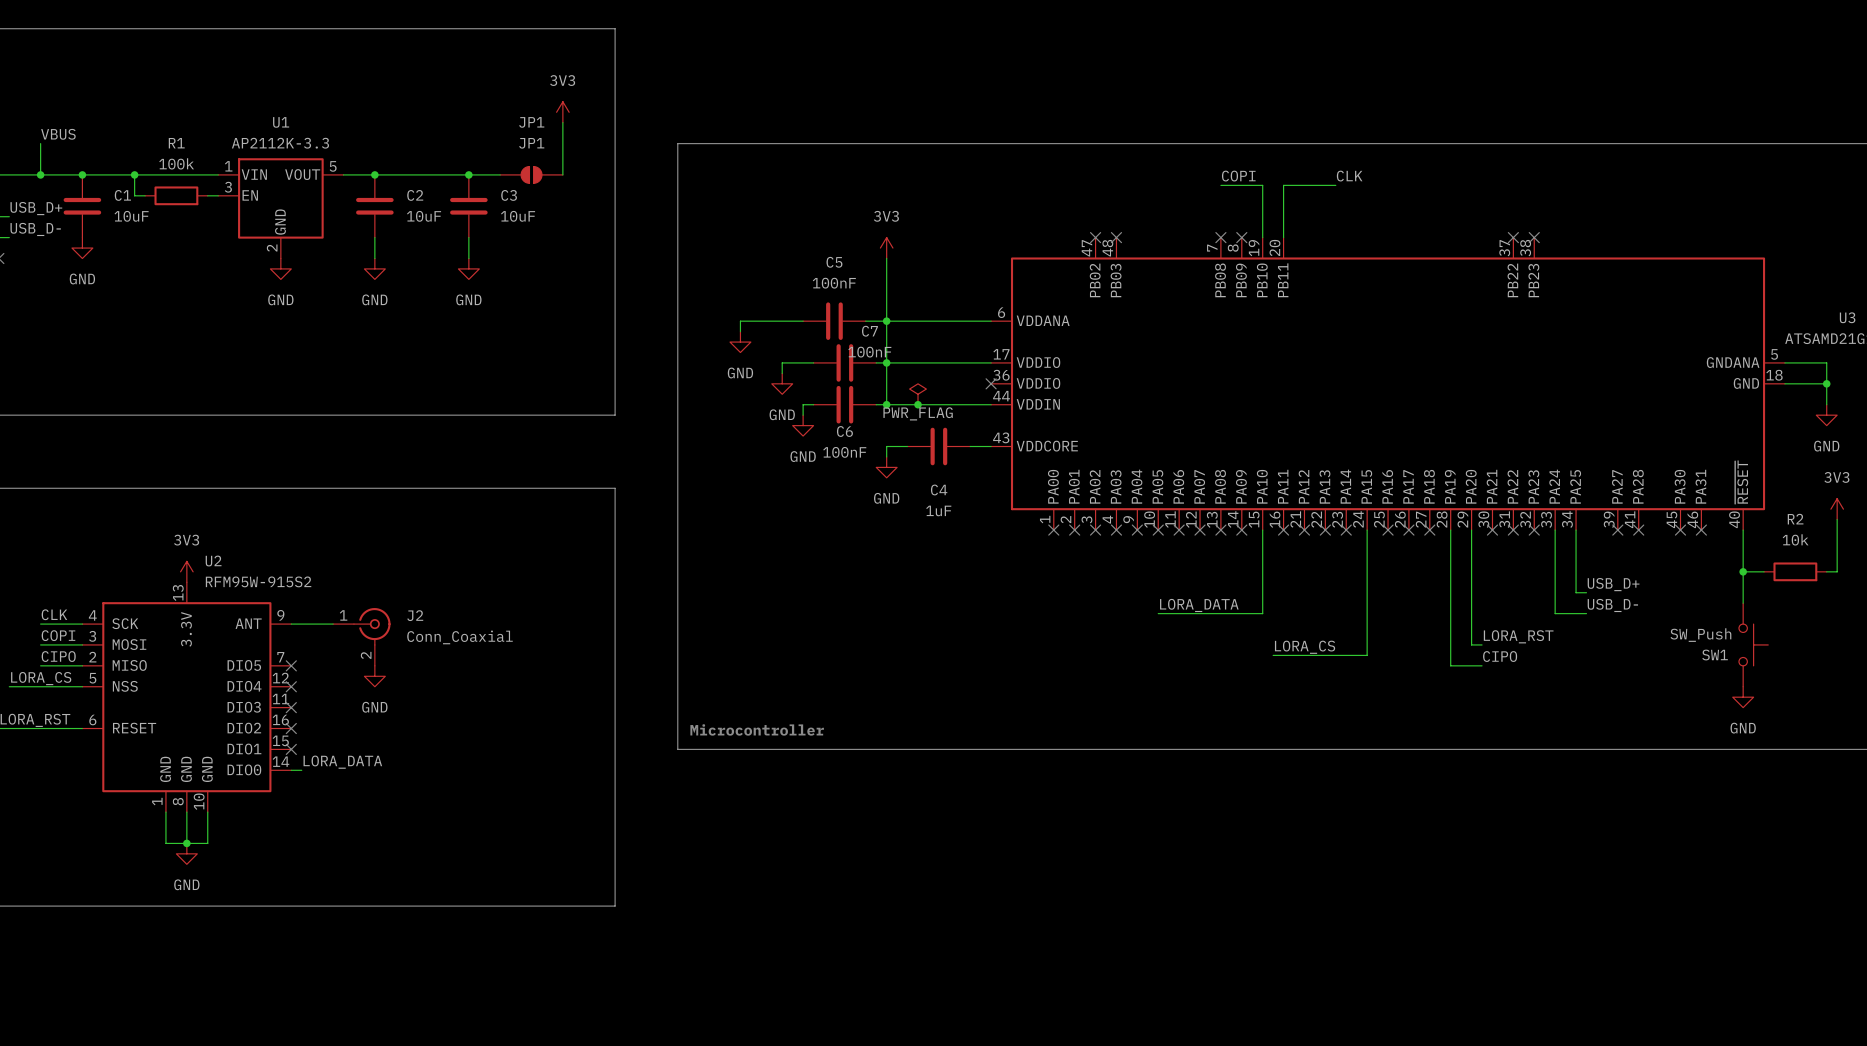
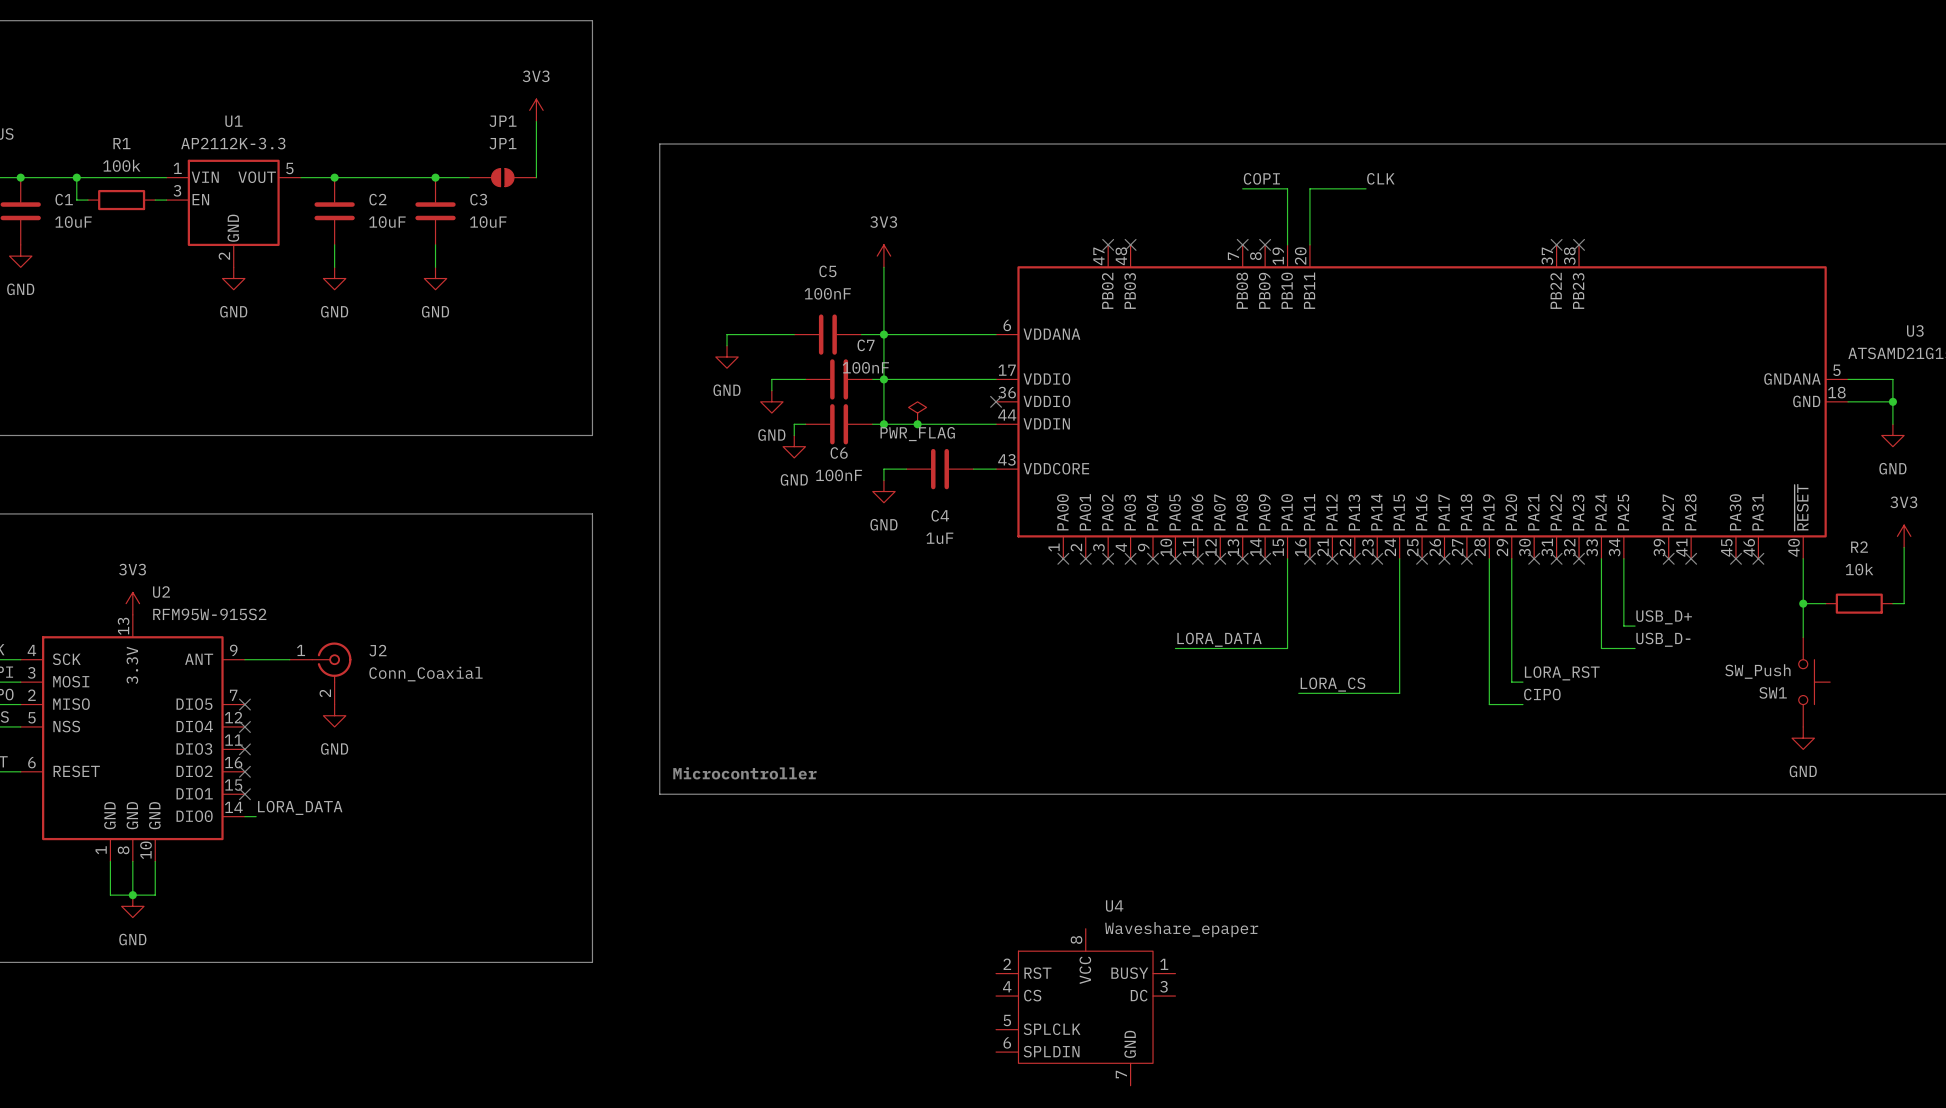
U4: none -> Waveshare_epaper (1085, 1007)

